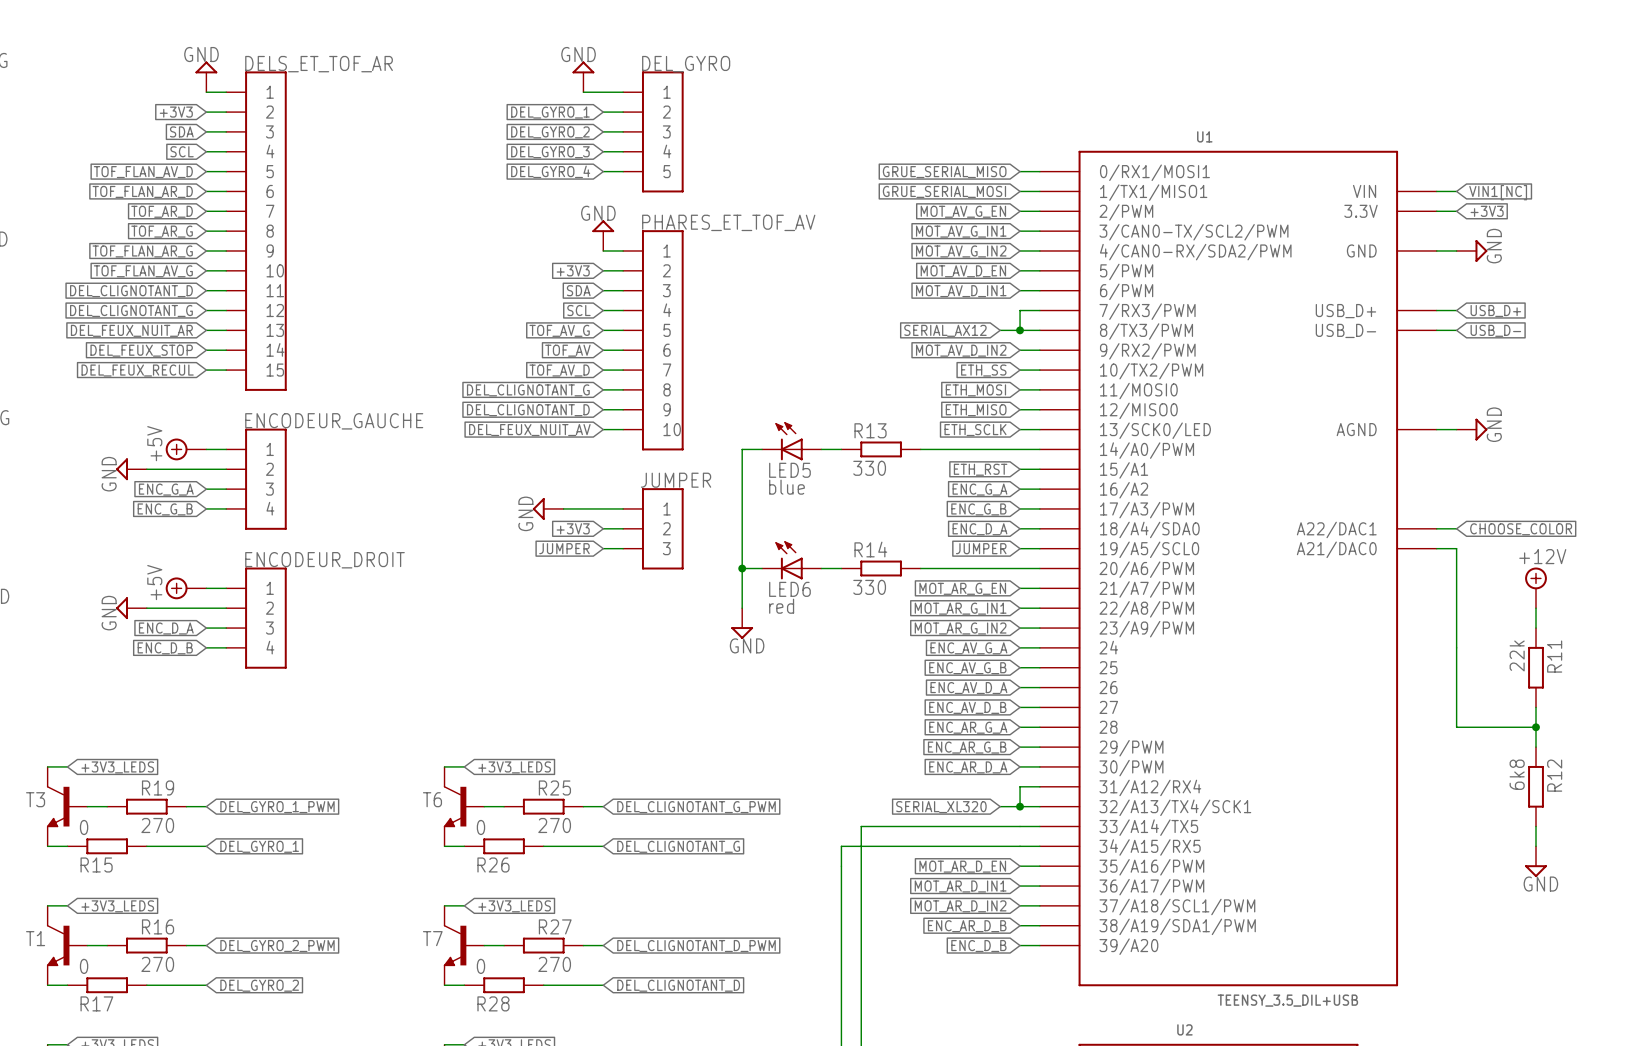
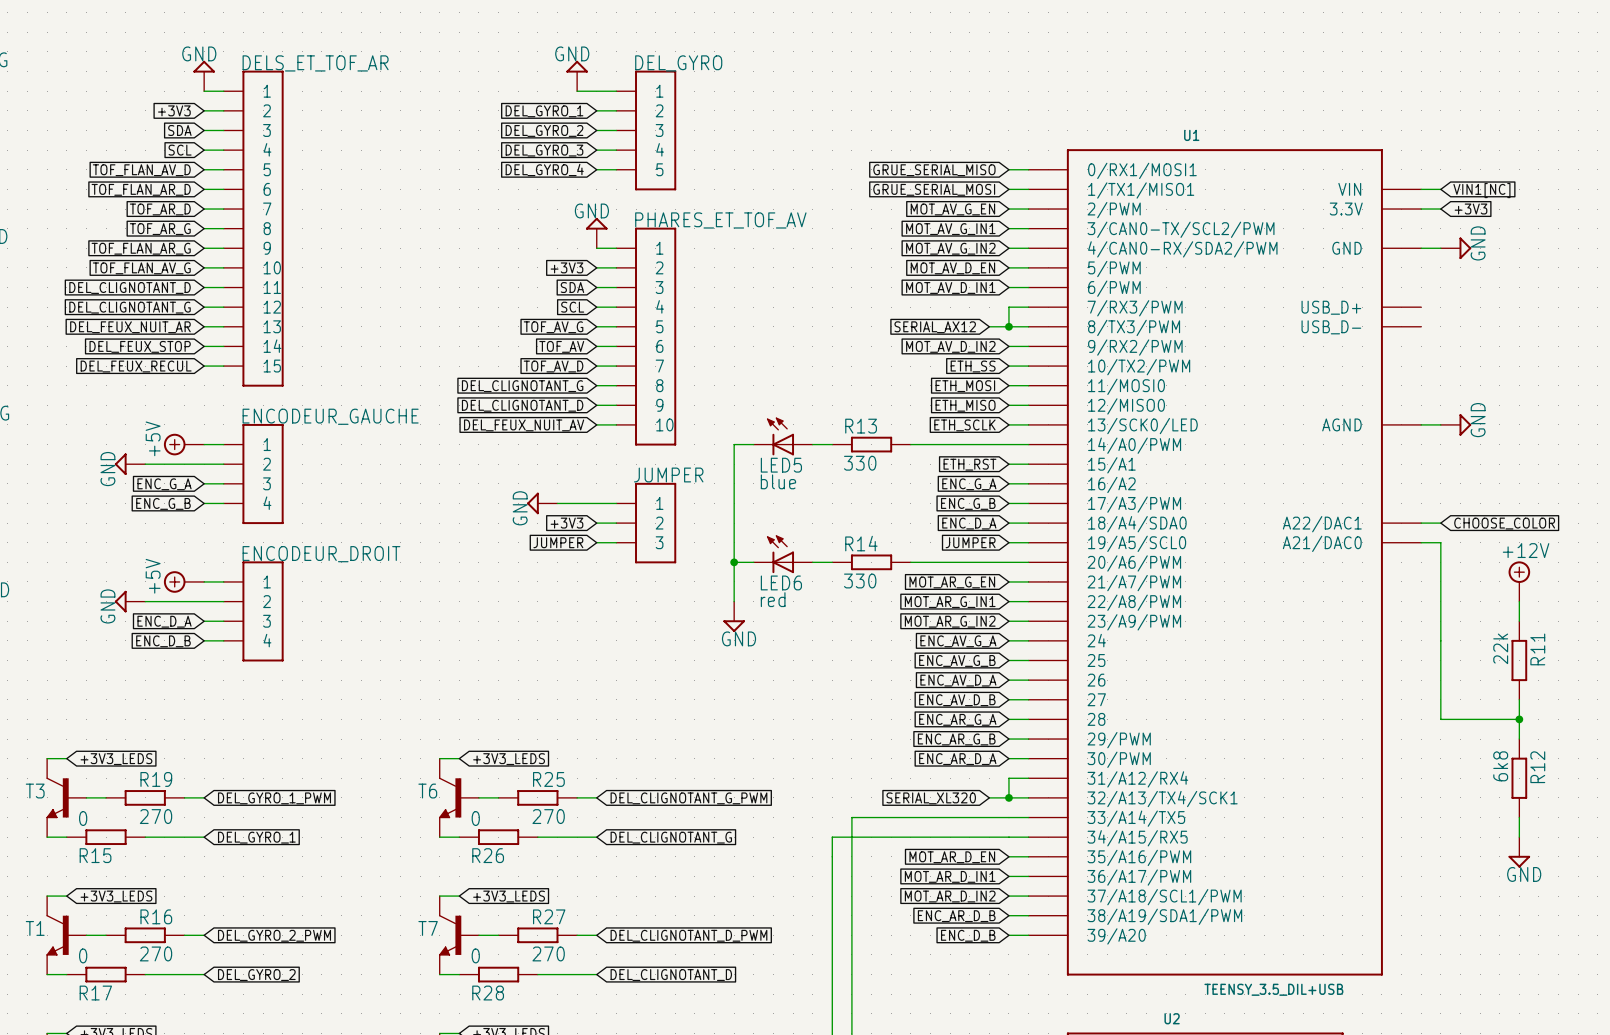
wire: (1436, 310) (1456, 310) -> none
global label: USB_D+ (1495, 311) -> none
wire: (1436, 330) (1456, 330) -> none
global label: USB_D- (1495, 330) -> none

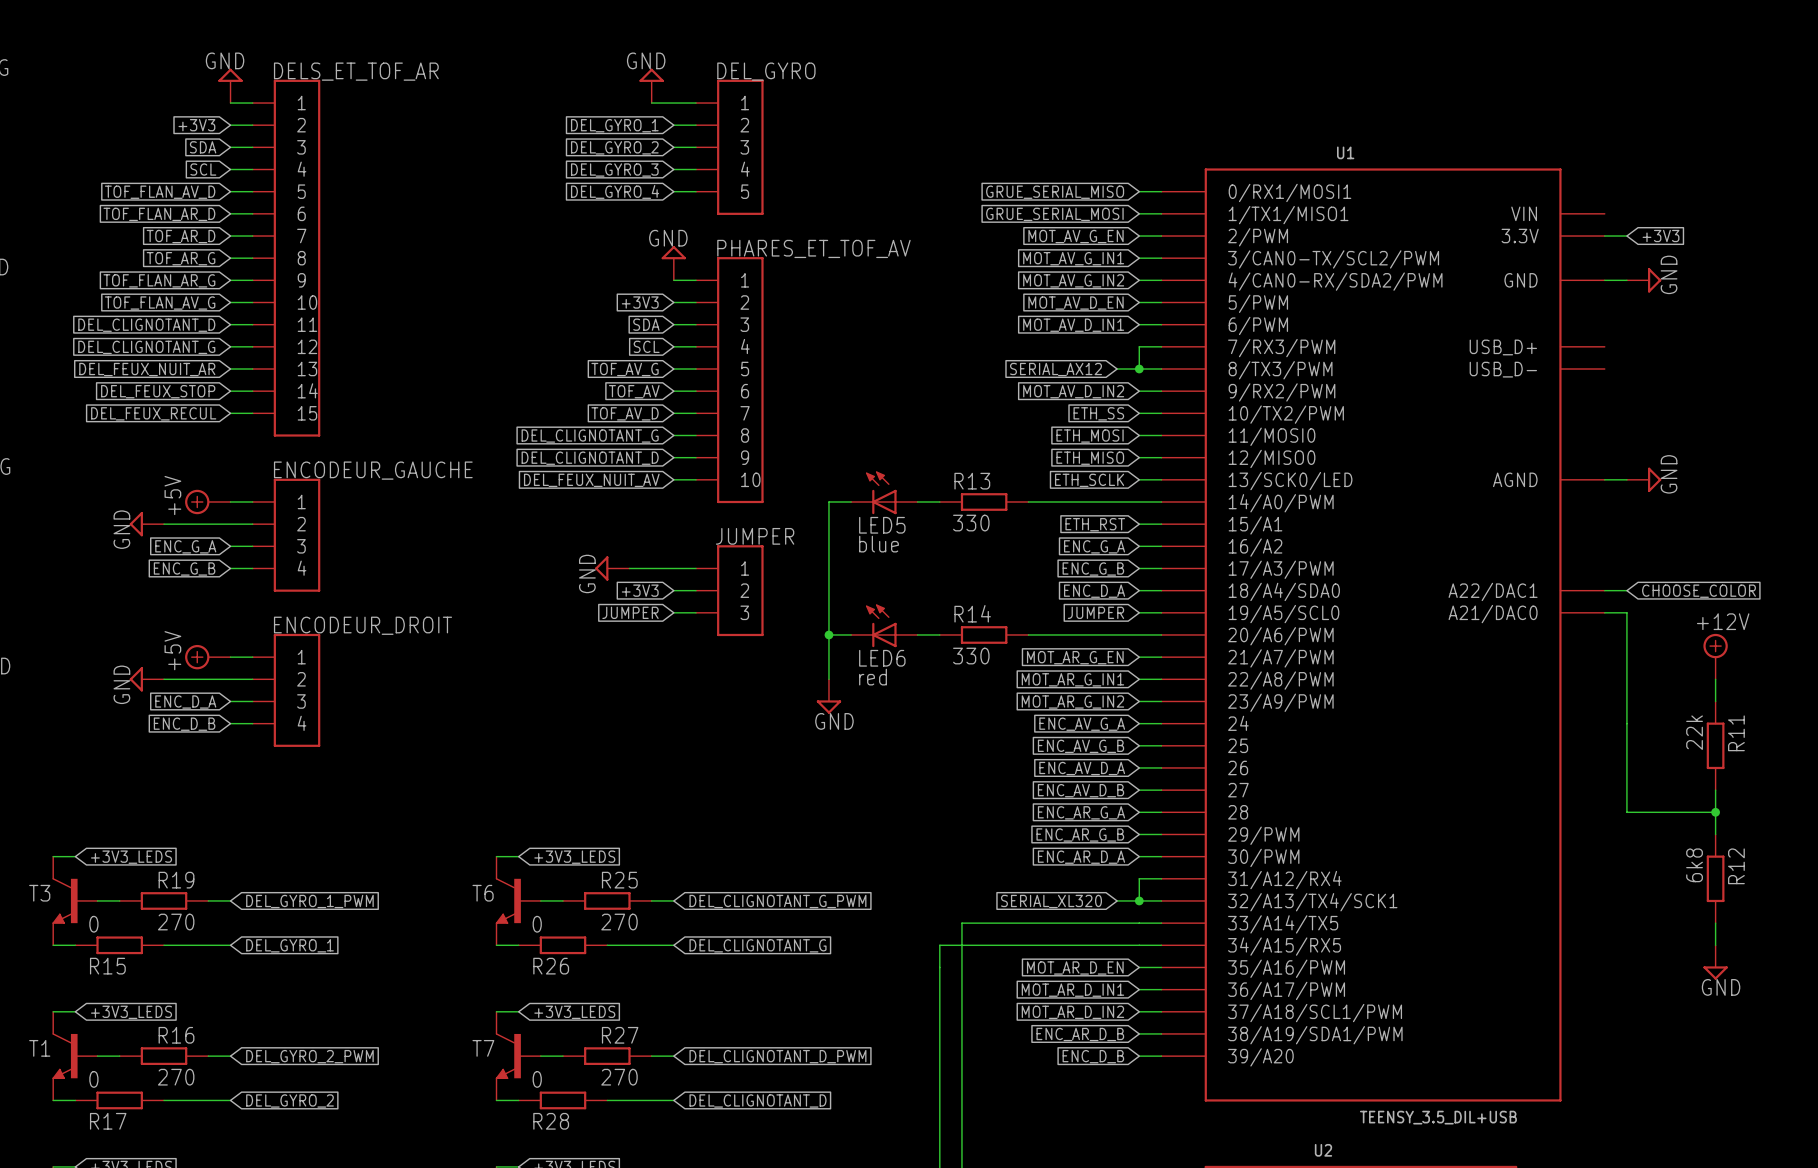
wire: (1421, 189) (1440, 189) -> none
global label: VIN1[NC] (1481, 190) -> none

